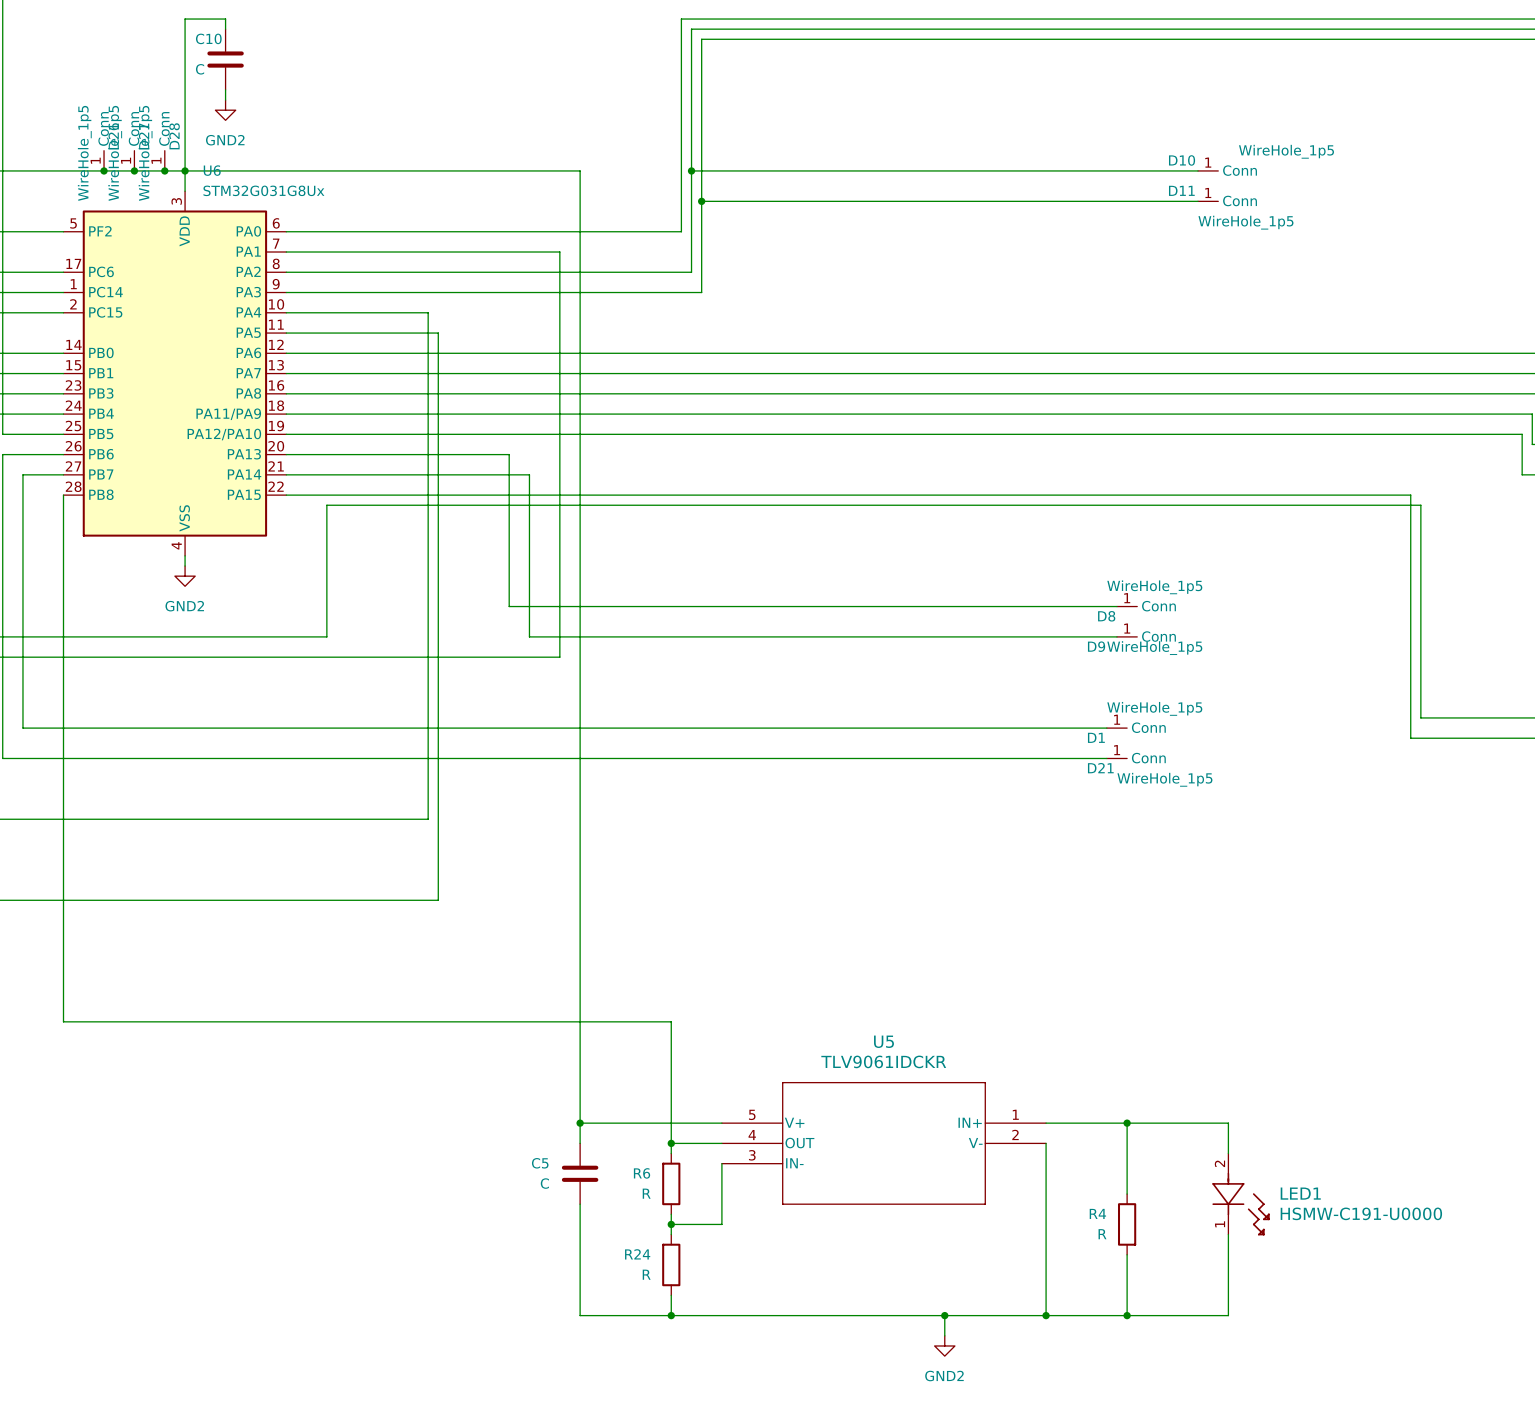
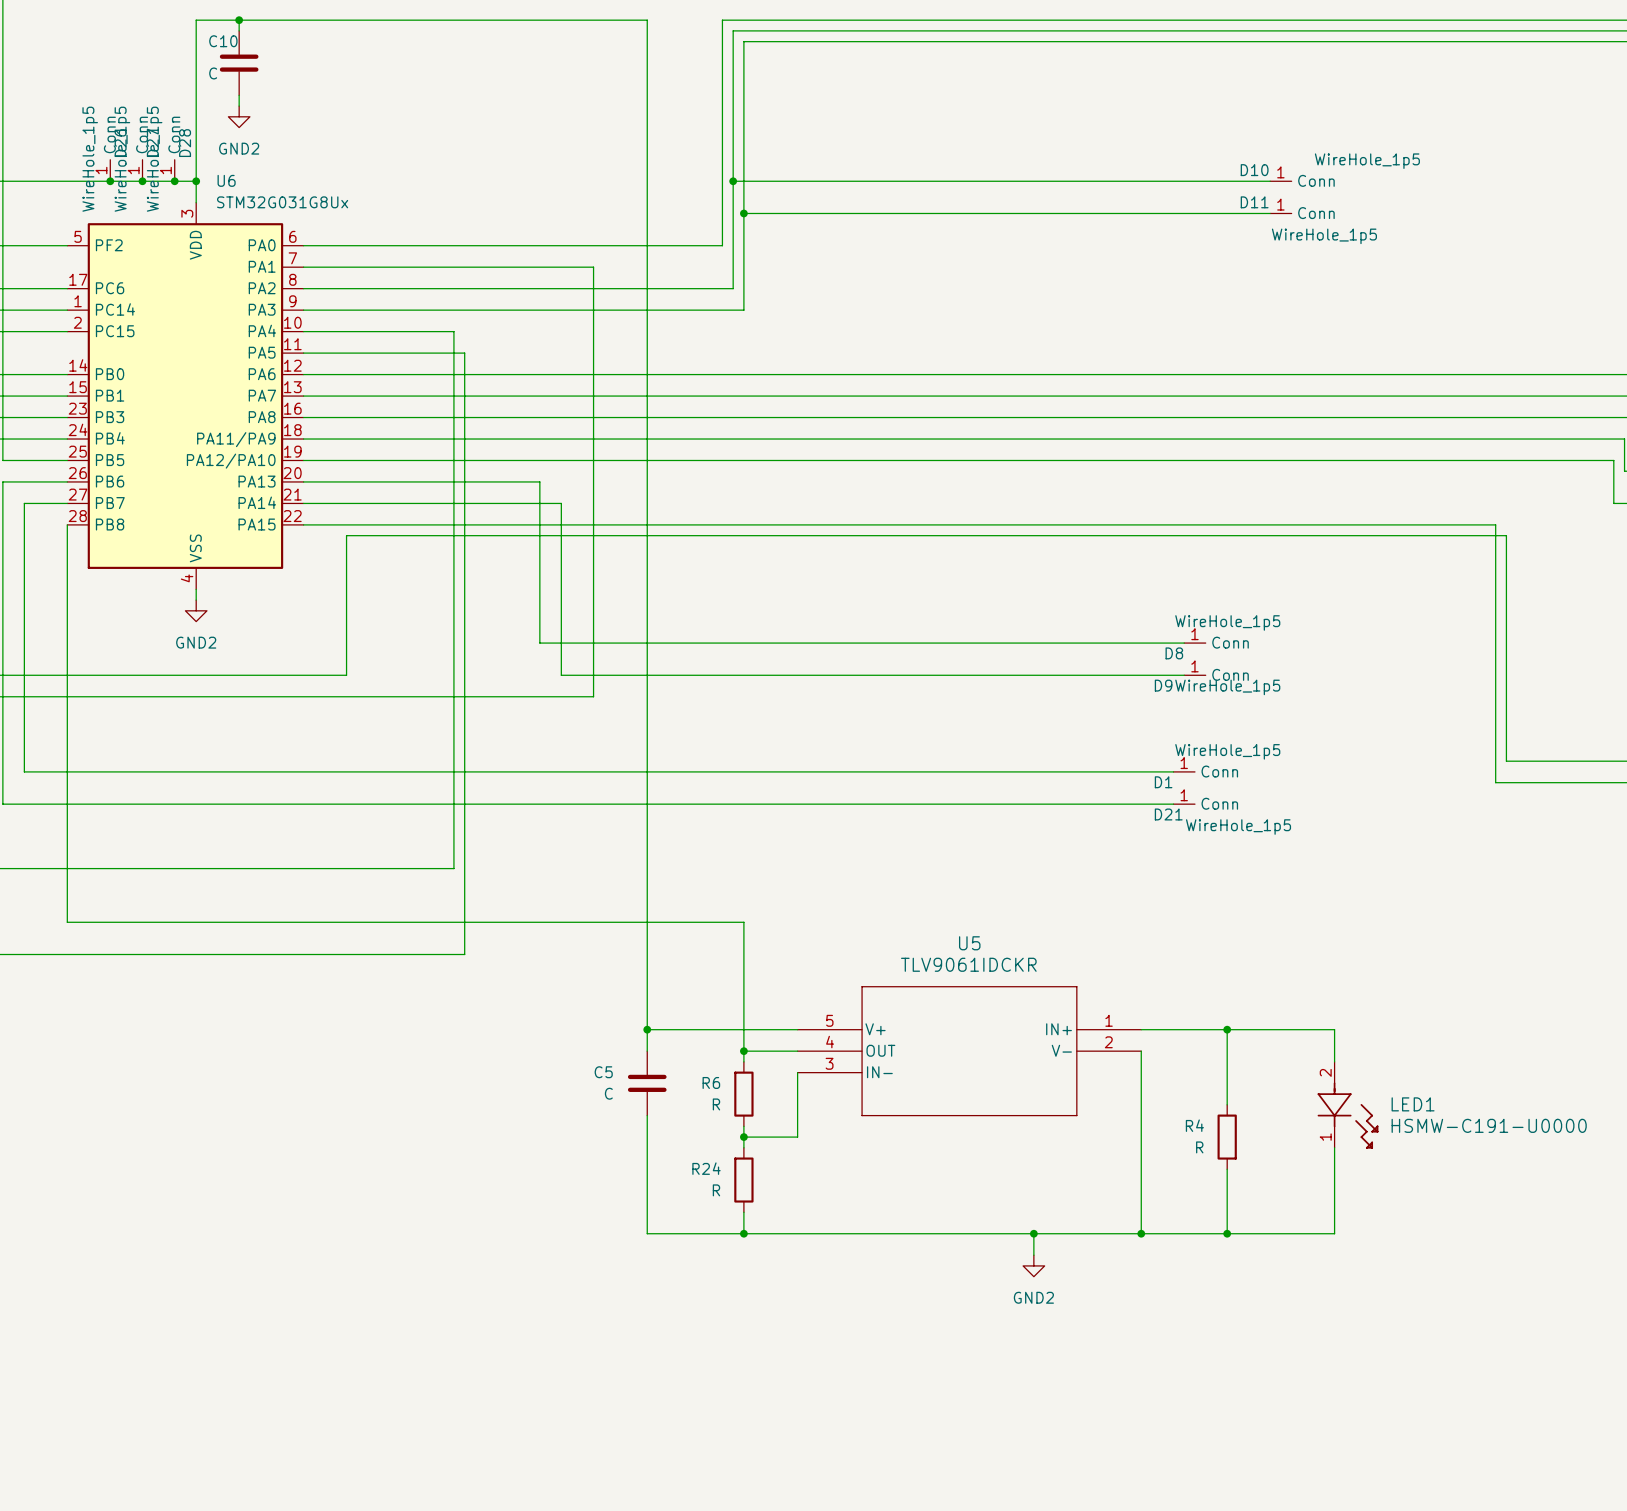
wire: none -> (239, 20) (647, 20) (647, 1051)
junction: none -> (239, 20)
wire: (185, 170) (580, 170) (580, 1143) -> none
wire: (63, 869) (63, 1021) (671, 1021) (671, 1153) -> (67, 922) (743, 922) (743, 1061)
junction: none -> (647, 1029)
junction: none -> (1227, 1029)
junction: none -> (743, 1051)
junction: none -> (743, 1137)
wire: (580, 1123) (721, 1123) -> (647, 1029) (797, 1029)
junction: (580, 1123) -> none
wire: (1046, 1123) (1228, 1123) (1228, 1153) -> (1141, 1029) (1334, 1029) (1334, 1061)
wire: (1127, 1123) (1127, 1194) -> (1227, 1029) (1227, 1104)
junction: (1127, 1123) -> none
wire: (671, 1143) (721, 1143) -> (743, 1051) (797, 1051)
junction: (671, 1143) -> none
U5 position: (883, 1143) -> (969, 1051)
wire: (1046, 1143) (1046, 1315) -> (1141, 1051) (1141, 1233)
junction: none -> (743, 1233)
wire: (721, 1163) (721, 1224) (671, 1224) -> (797, 1072) (797, 1137) (743, 1137)
junction: none -> (1033, 1233)
junction: none -> (1141, 1233)
junction: none -> (1227, 1233)
C5 position: (580, 1173) -> (647, 1083)
R6 position: (671, 1183) -> (743, 1094)
LED1 position: (1241, 1194) -> (1348, 1105)
wire: (580, 1204) (580, 1315) (1228, 1315) (1228, 1234) -> (647, 1115) (647, 1233) (1334, 1233) (1334, 1147)
wire: (671, 1214) (671, 1234) -> (743, 1126) (743, 1147)
junction: (671, 1224) -> none
R4 position: (1127, 1224) -> (1227, 1137)
wire: (1127, 1254) (1127, 1315) -> (1227, 1169) (1227, 1233)
R24 position: (671, 1264) -> (743, 1180)
wire: (671, 1295) (671, 1315) -> (743, 1212) (743, 1233)
junction: (671, 1315) -> none
wire: (944, 1315) (944, 1335) -> (1033, 1233) (1033, 1255)
junction: (944, 1315) -> none
junction: (1046, 1315) -> none
junction: (1127, 1315) -> none
power symbol position: GND2 (944, 1345) -> GND2 (1033, 1265)

